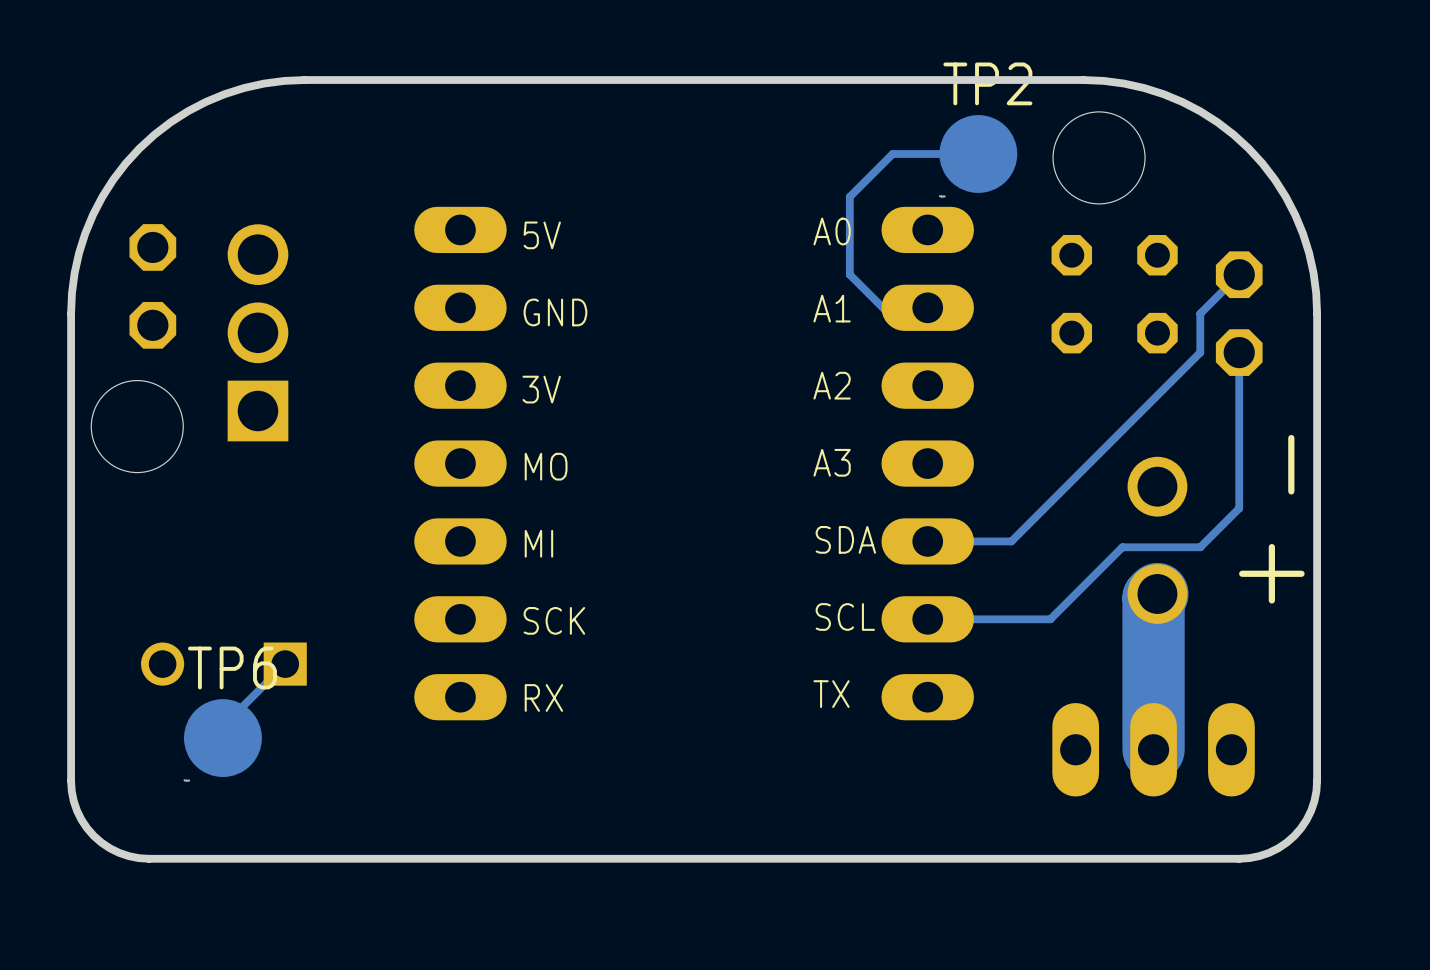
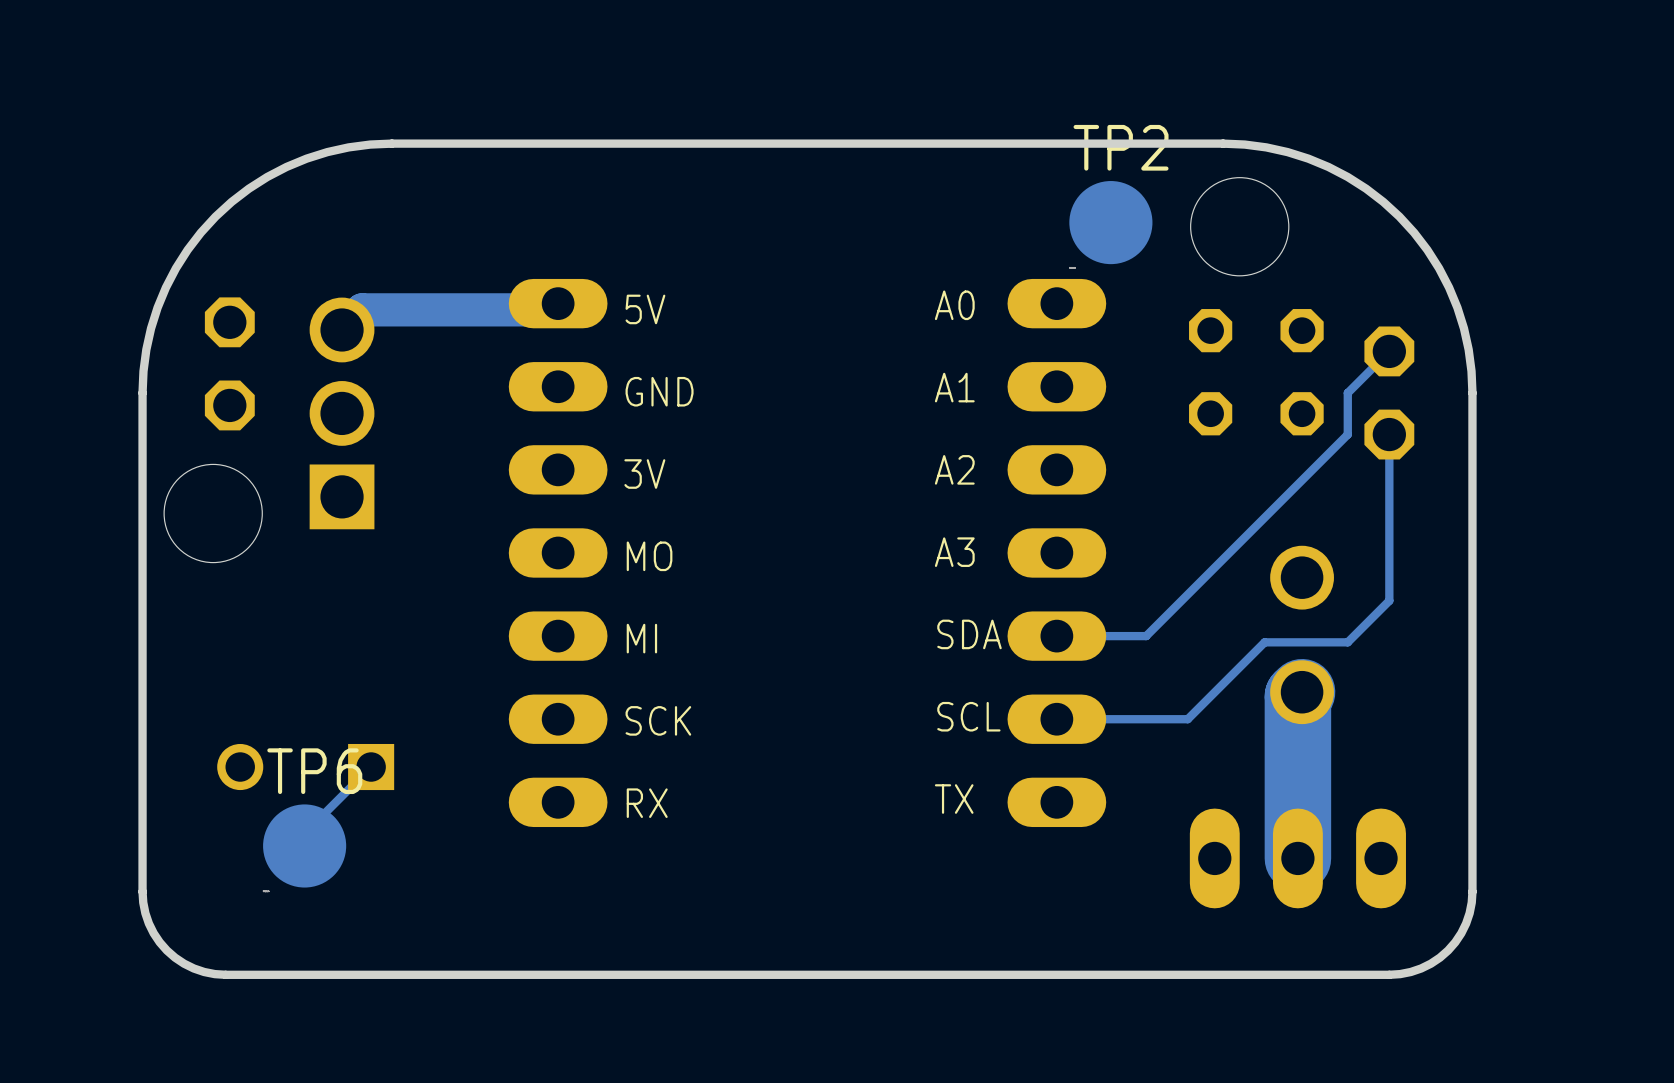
track: (978, 154) (892, 154) (849, 196) (849, 274) (888, 313) (921, 313) (927, 307) -> none
track: none -> (558, 303) (551, 309) (362, 309) (342, 329)
text: - (1291, 464) -> none
text: + (1271, 573) -> none

